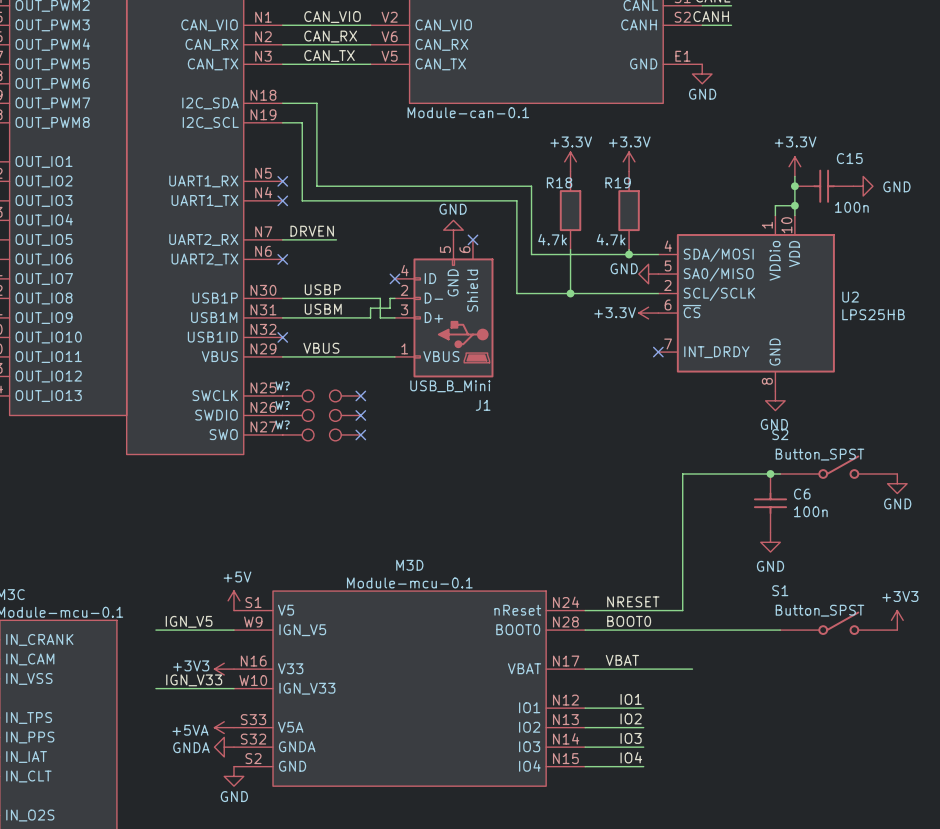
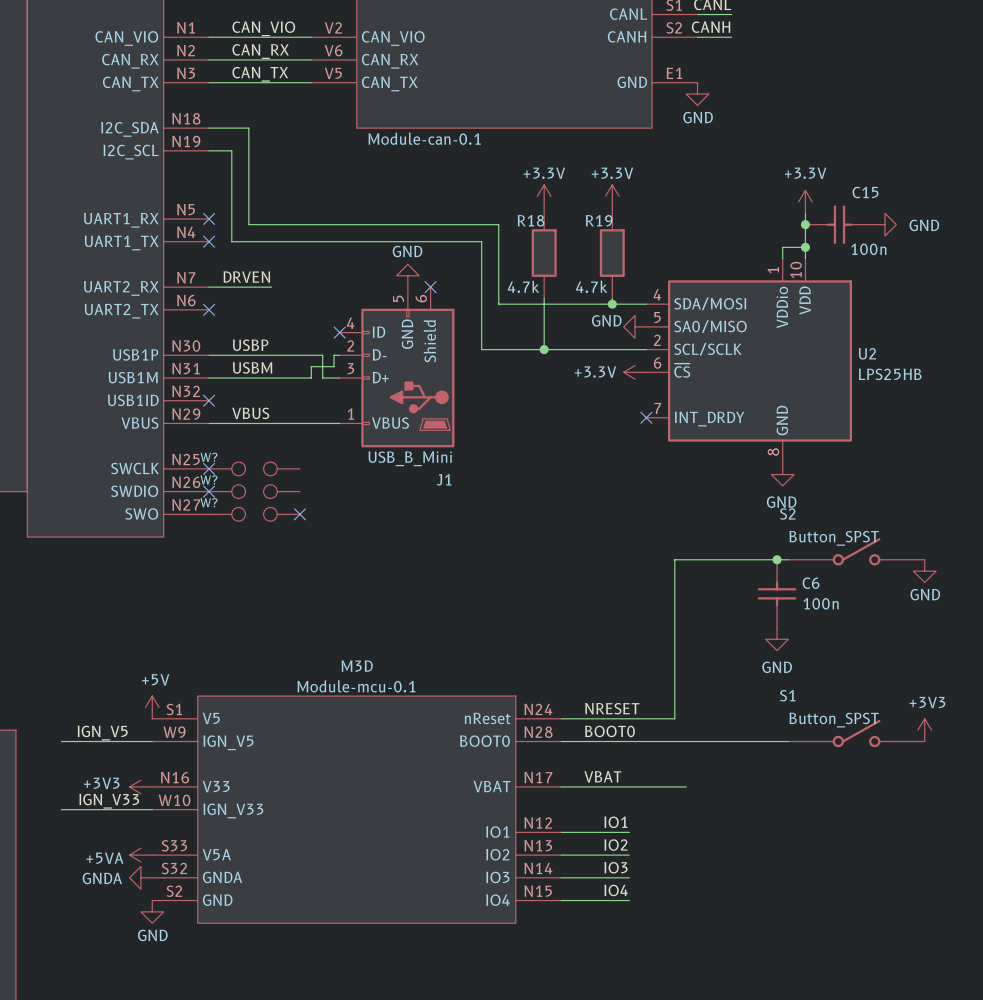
no-connect mark: none -> (209, 468)
no-connect mark: (360, 395) -> none
no-connect mark: none -> (209, 491)
no-connect mark: (360, 415) -> none

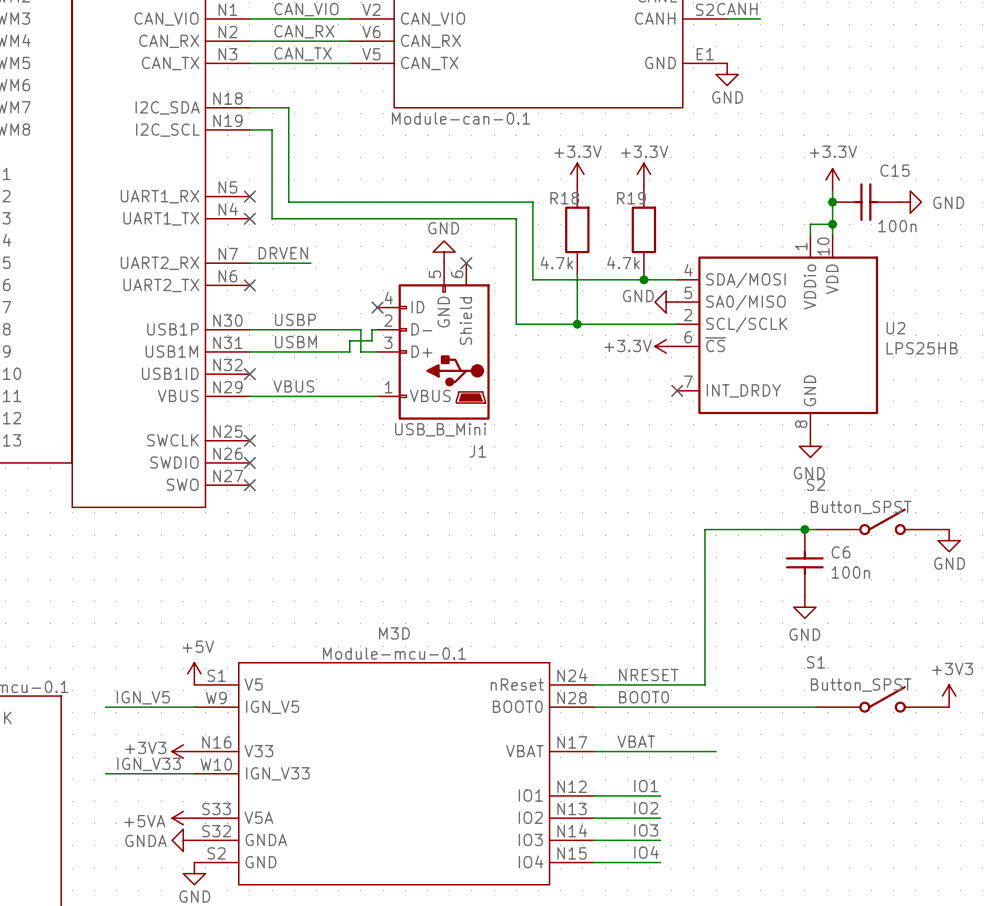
W?: (254, 468) -> none
W?: (254, 491) -> none
no-connect mark: none -> (249, 485)
W?: (254, 514) -> none
no-connect mark: (299, 514) -> none

